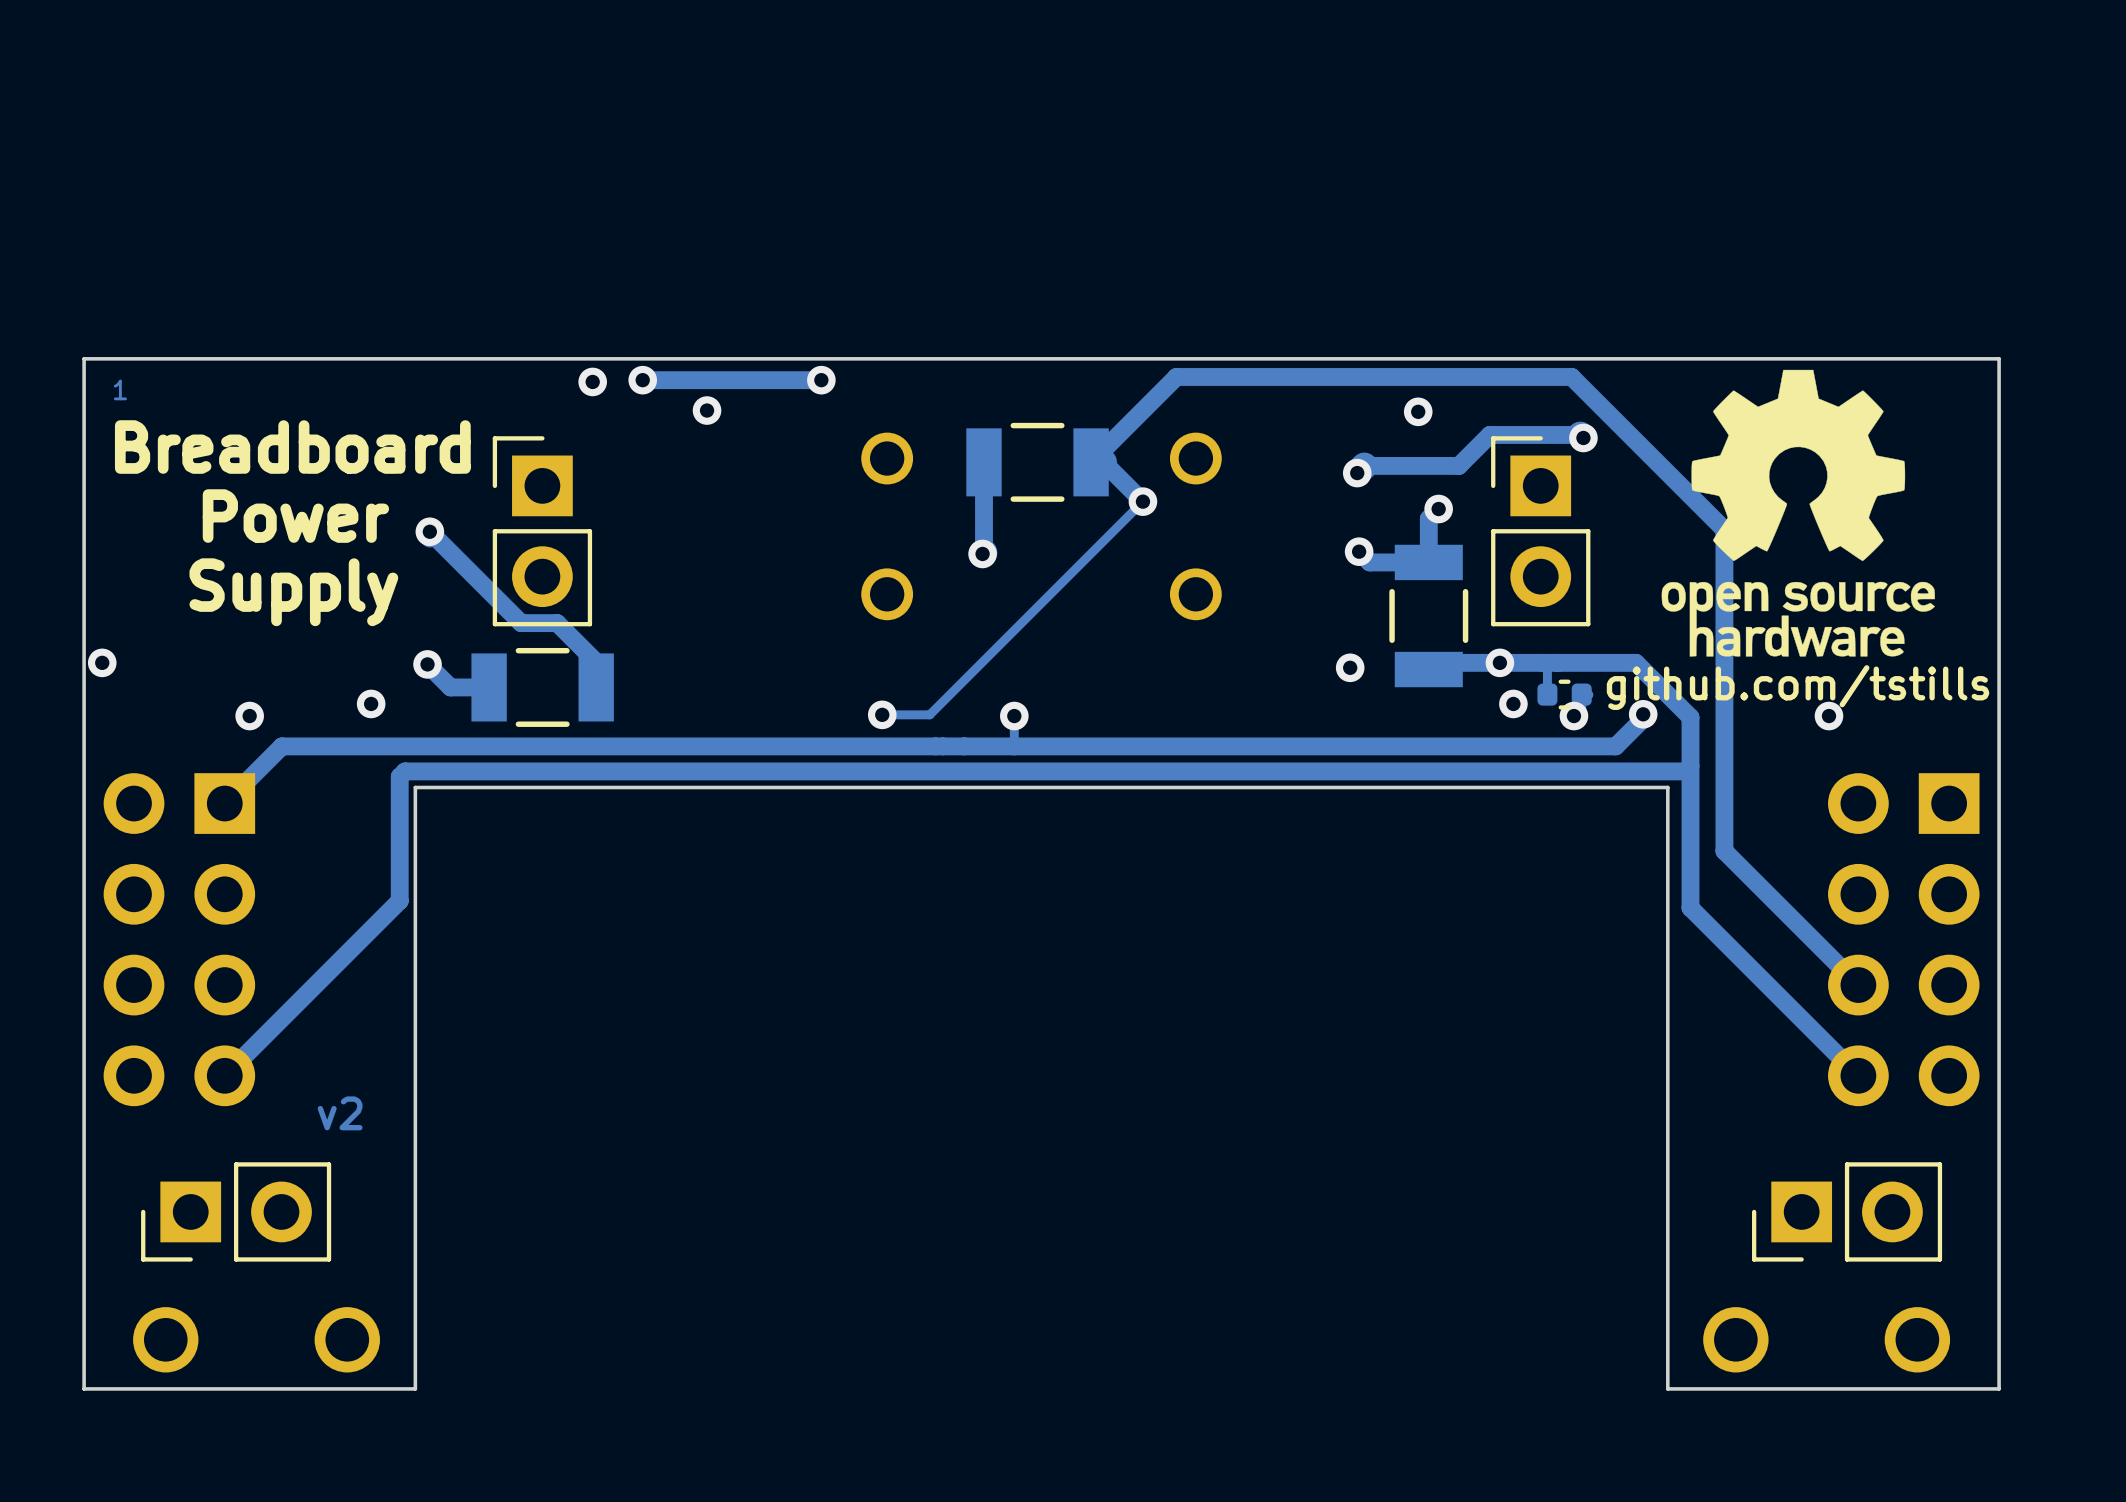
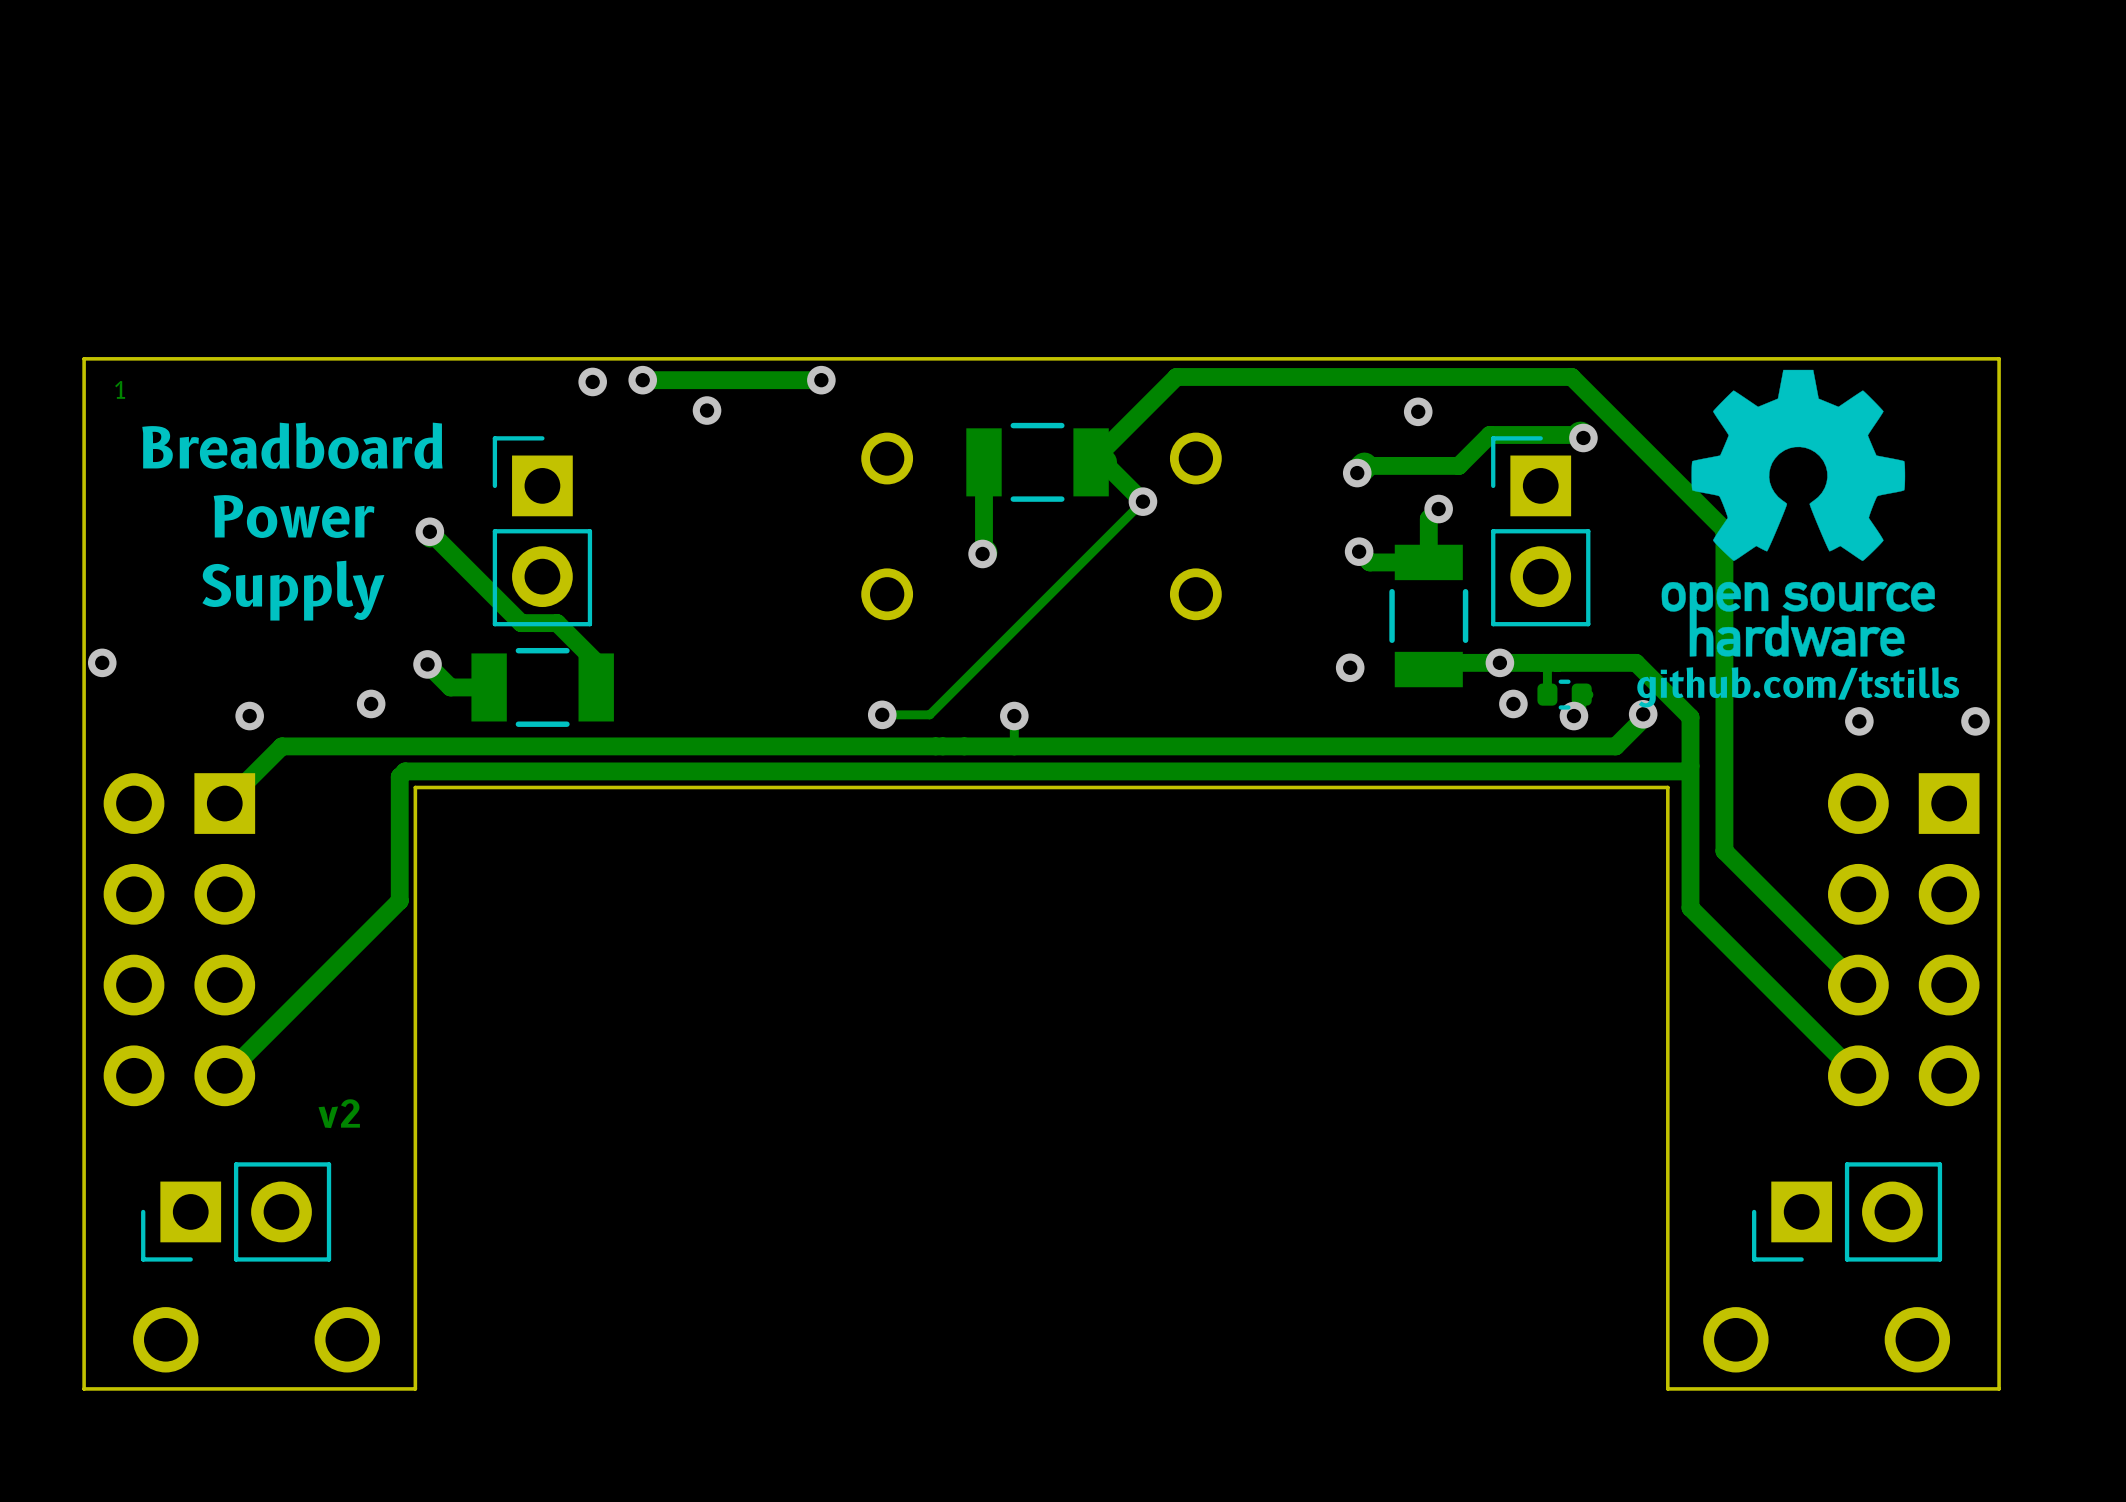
via position: (1828, 716) -> (1859, 721)
via: none -> (1975, 721)

